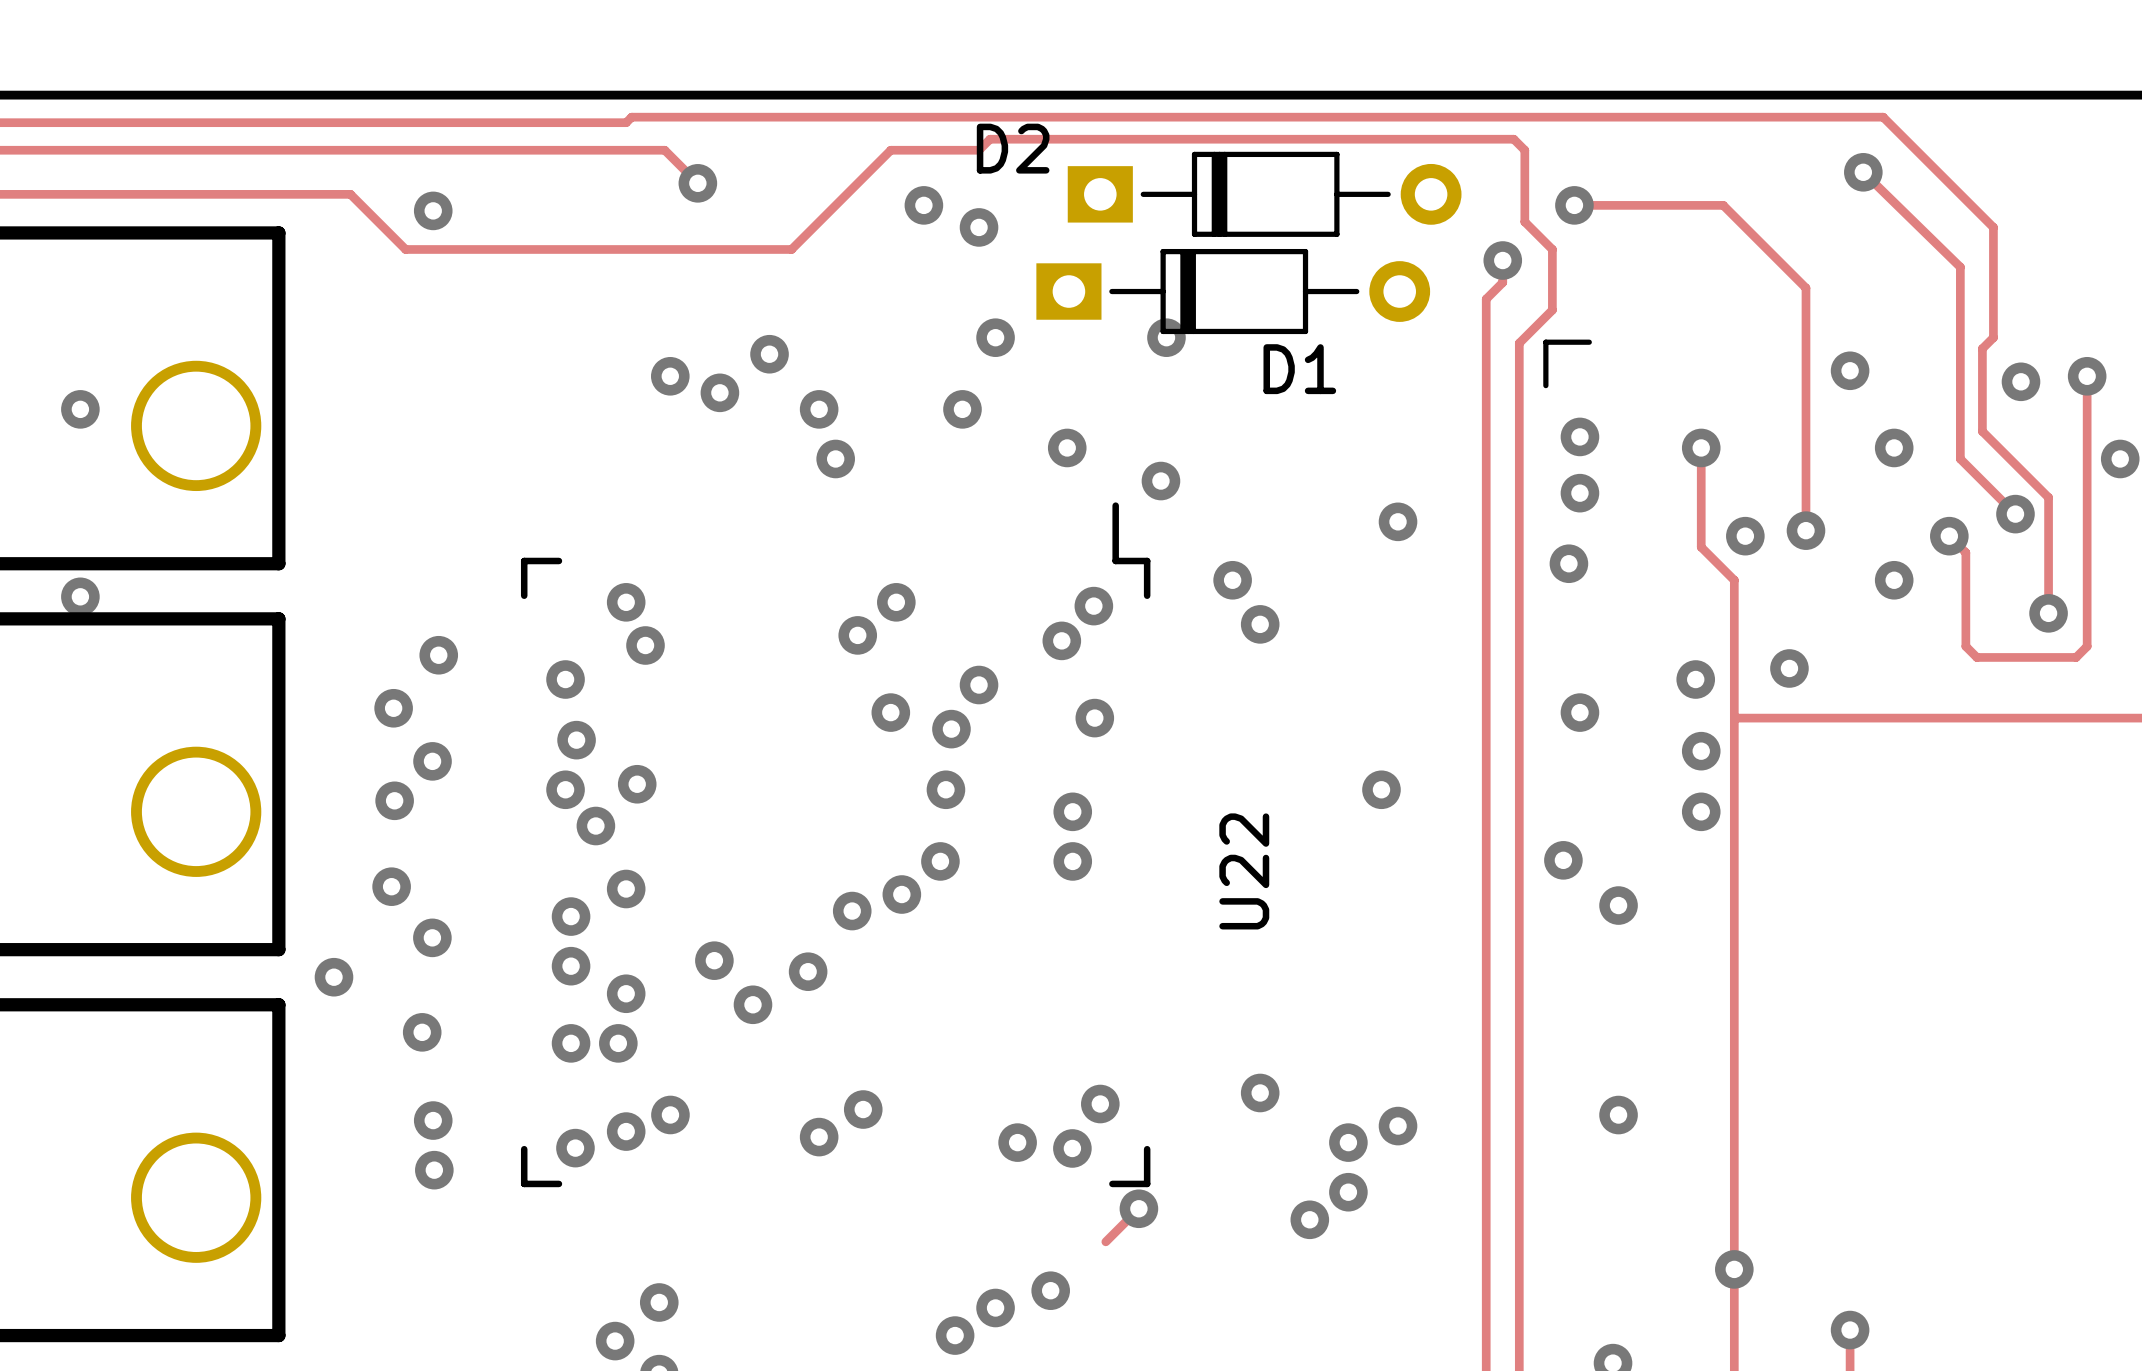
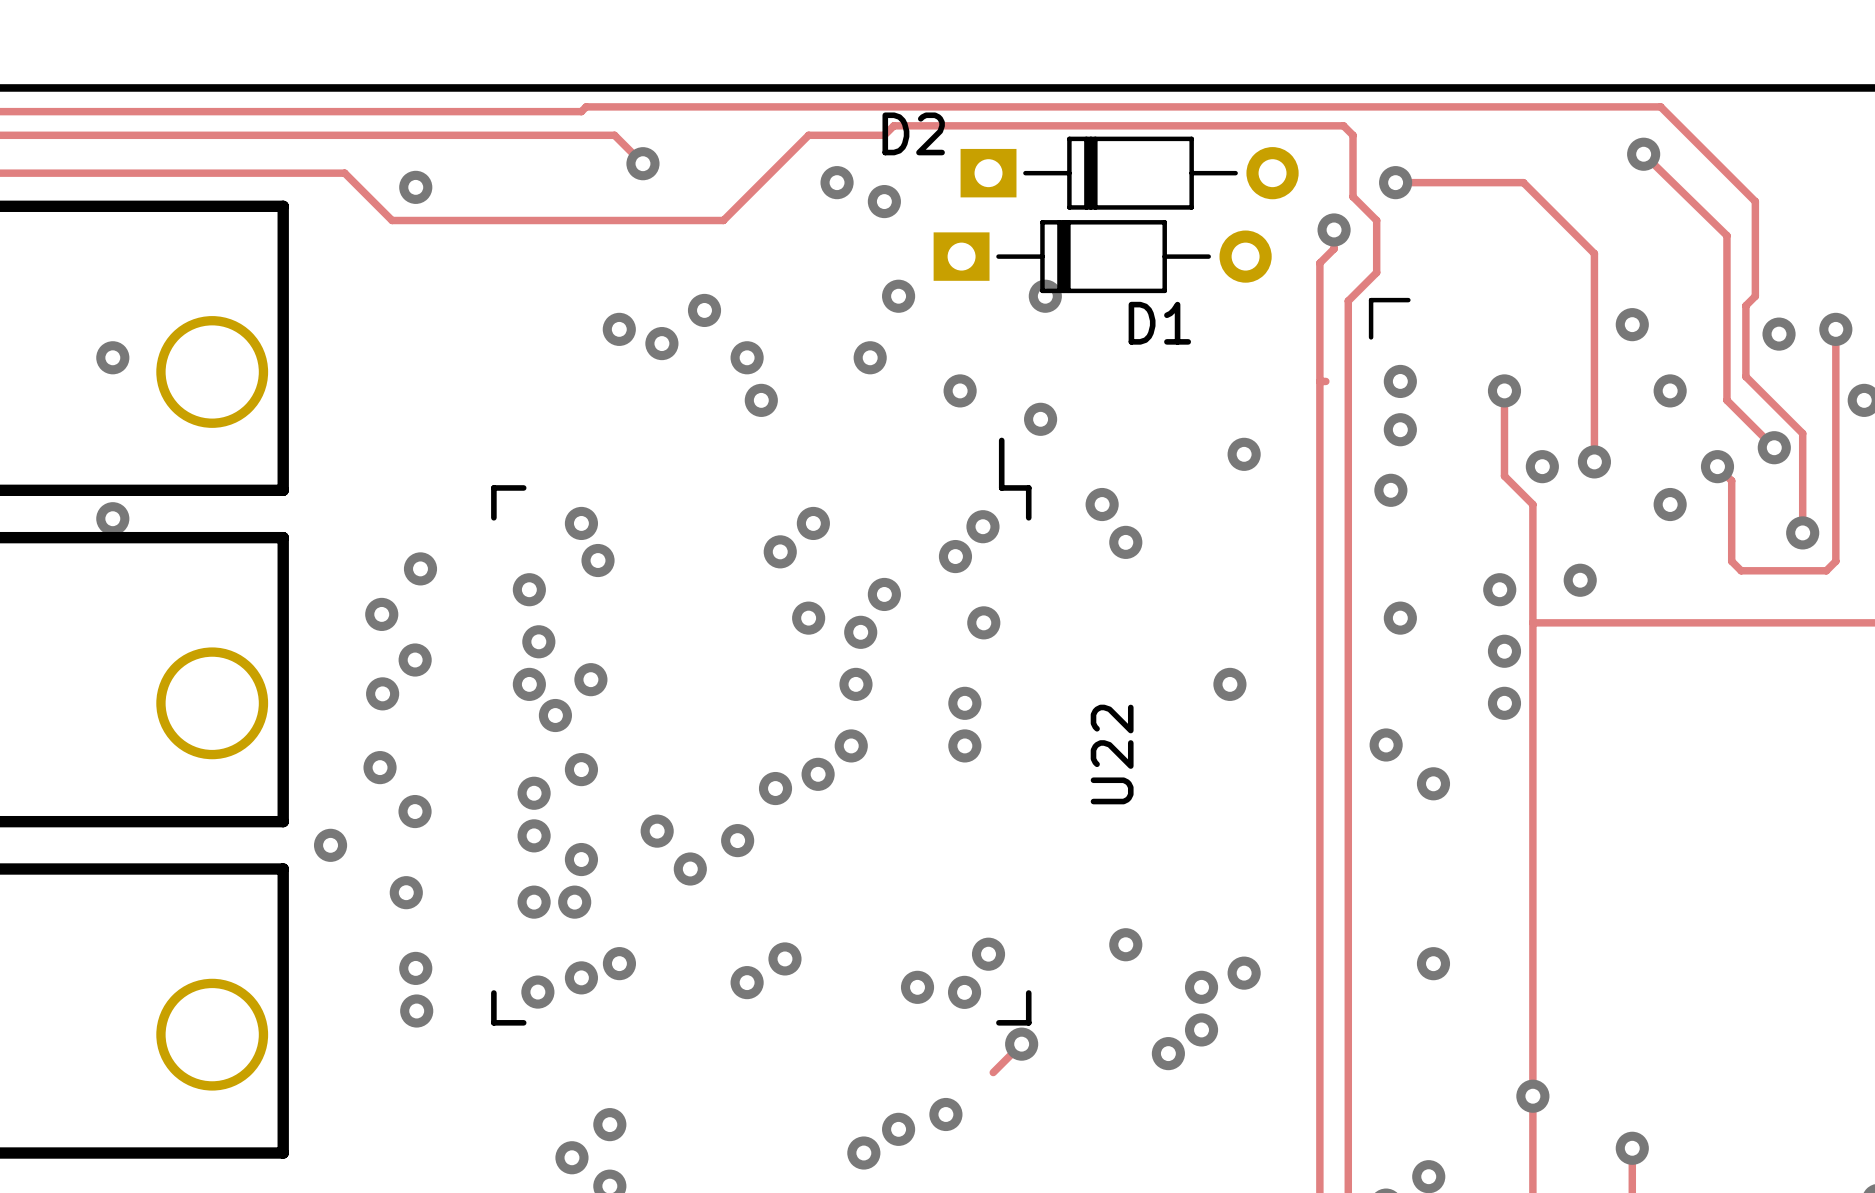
track: none -> (1319, 381) (1325, 381)

